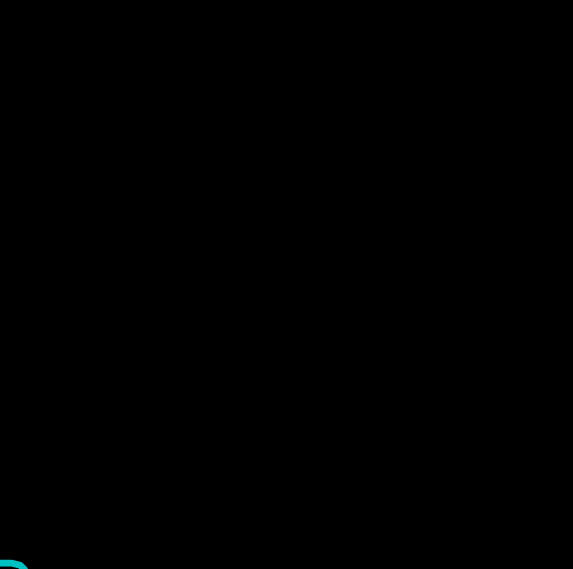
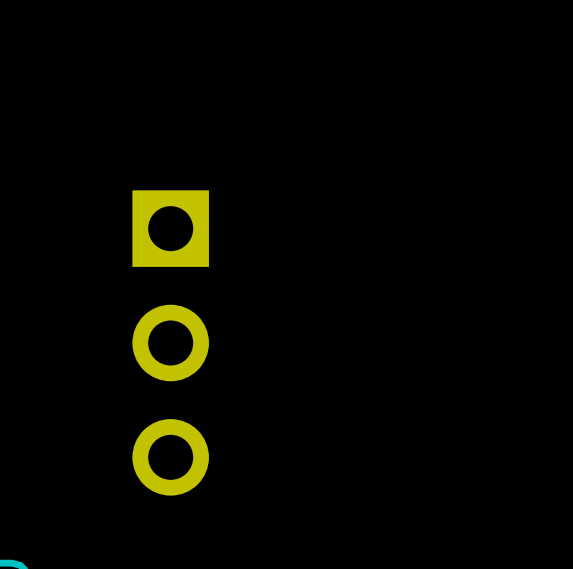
part: none -> (170, 342)

